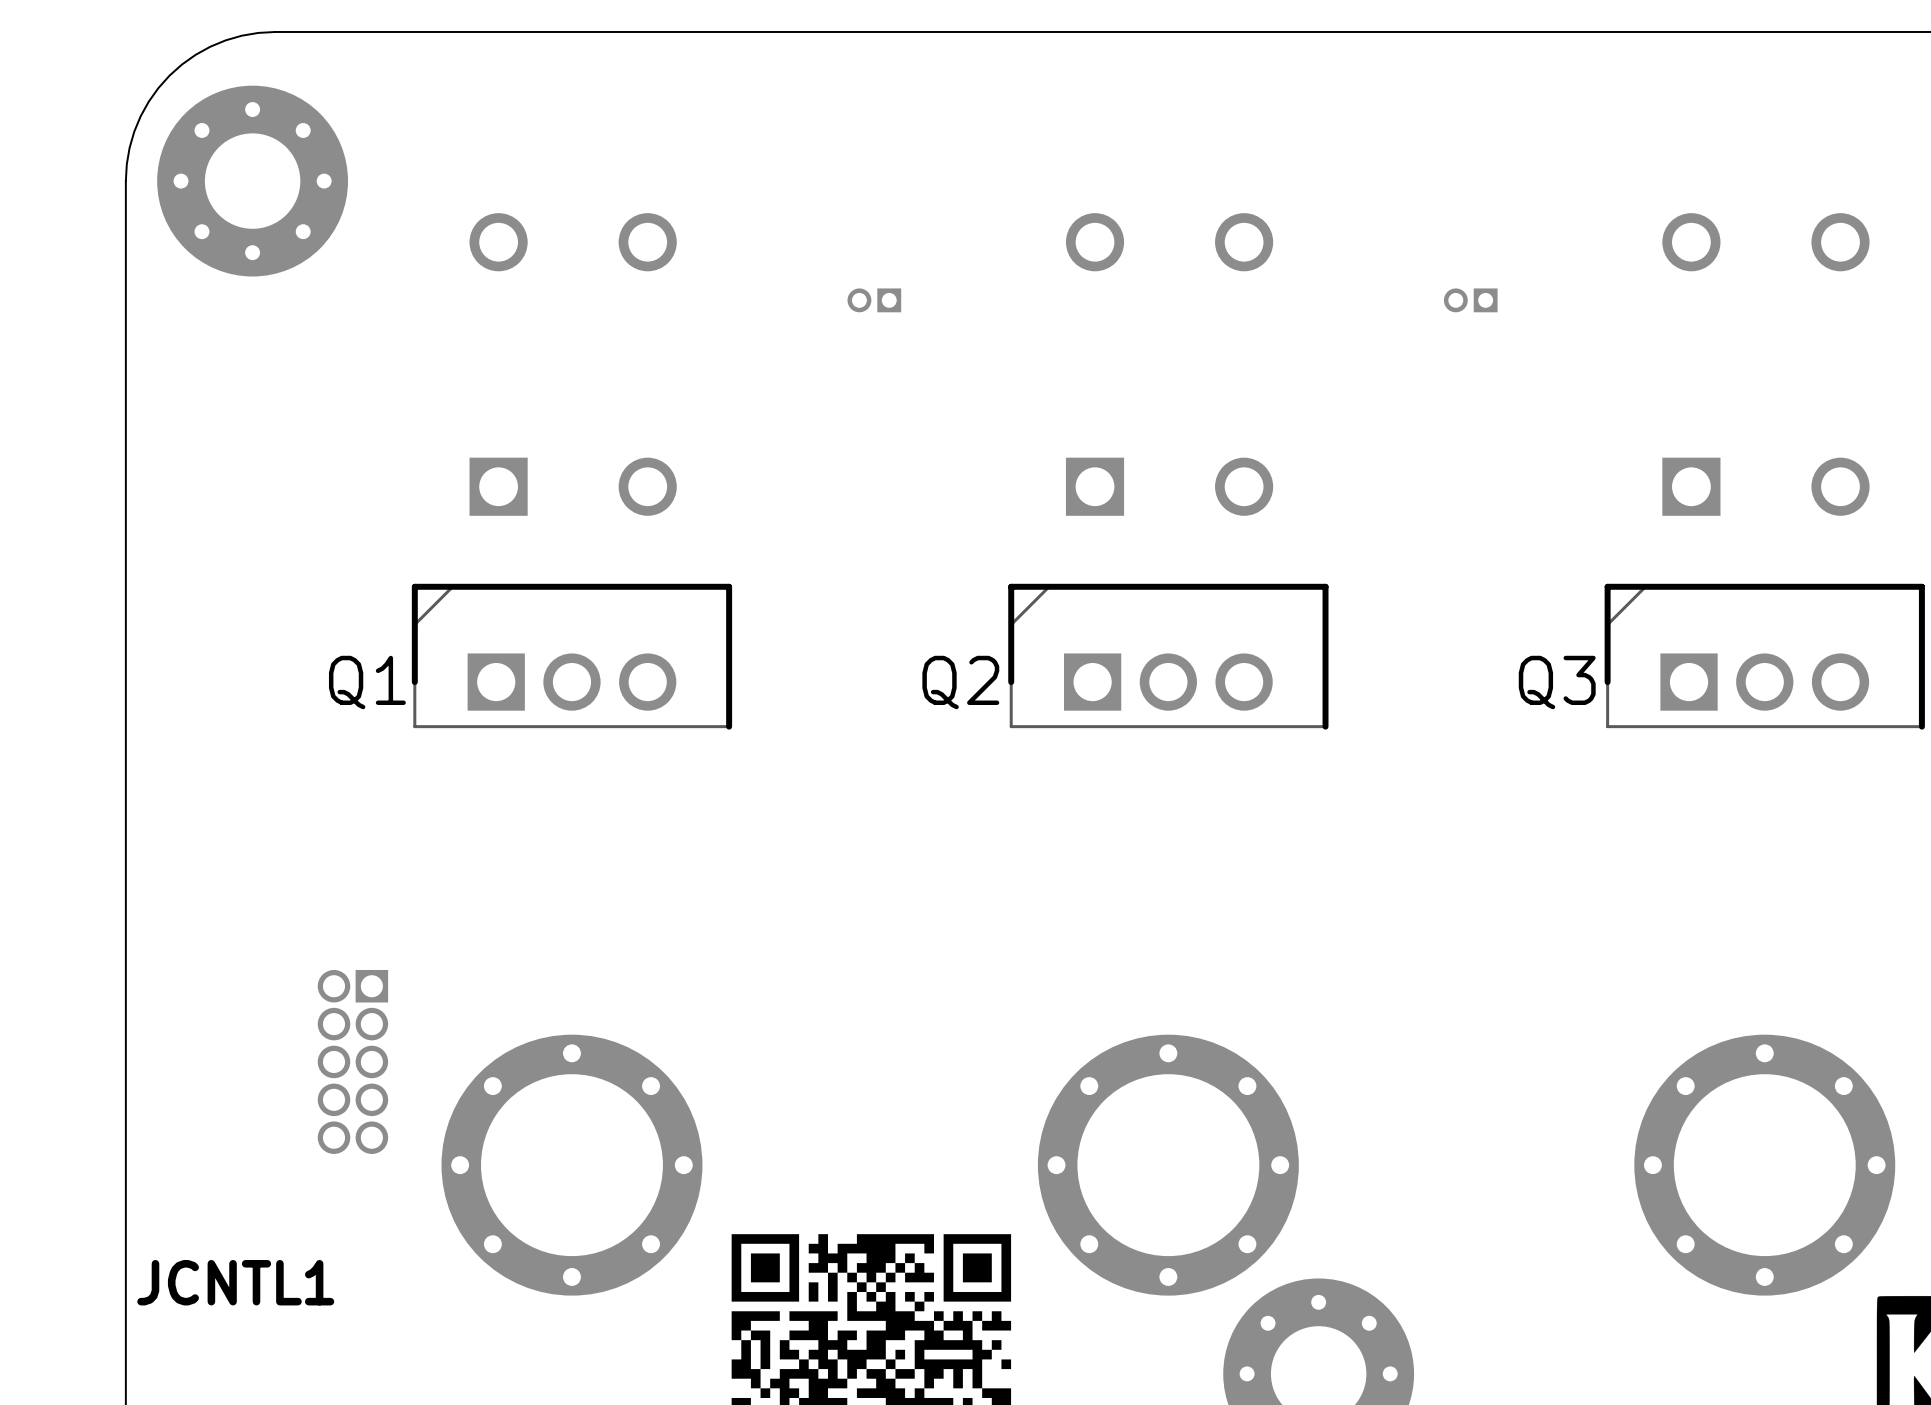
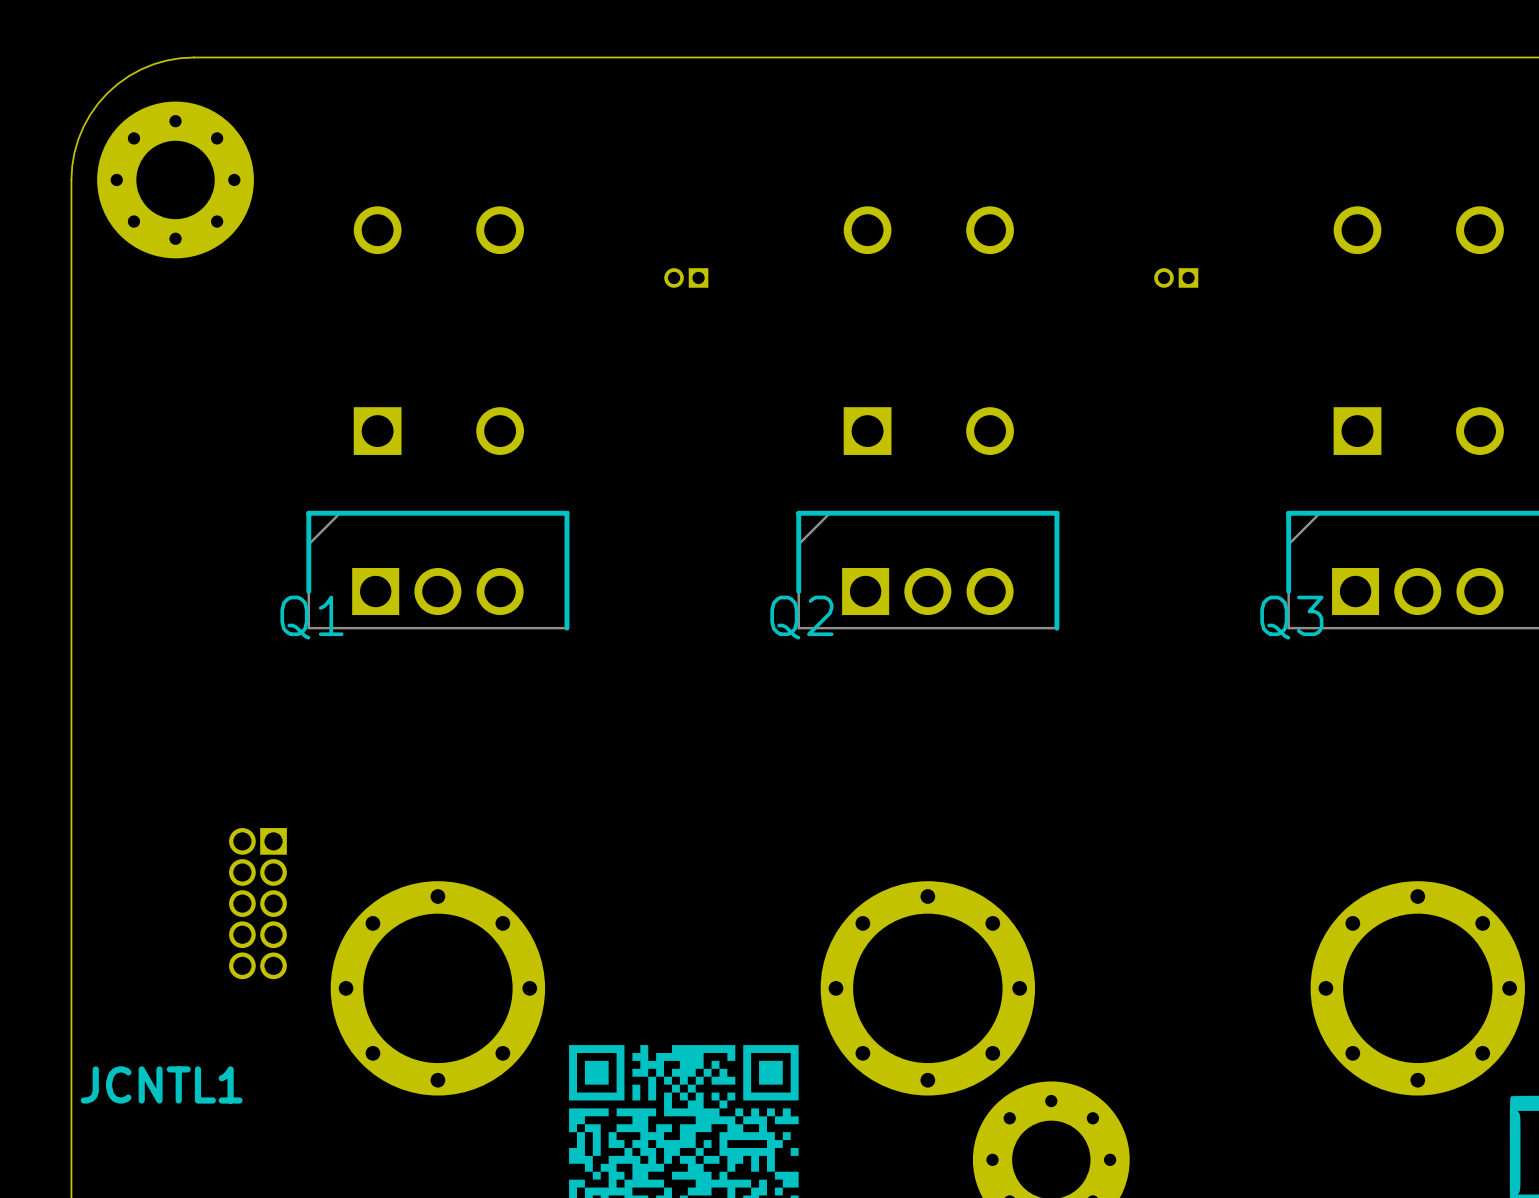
Q1 name position: Q1 (367, 682) -> Q1 (311, 617)
Q2 name position: Q2 (960, 682) -> Q2 (801, 617)
Q3 name position: Q3 (1557, 682) -> Q3 (1291, 617)

